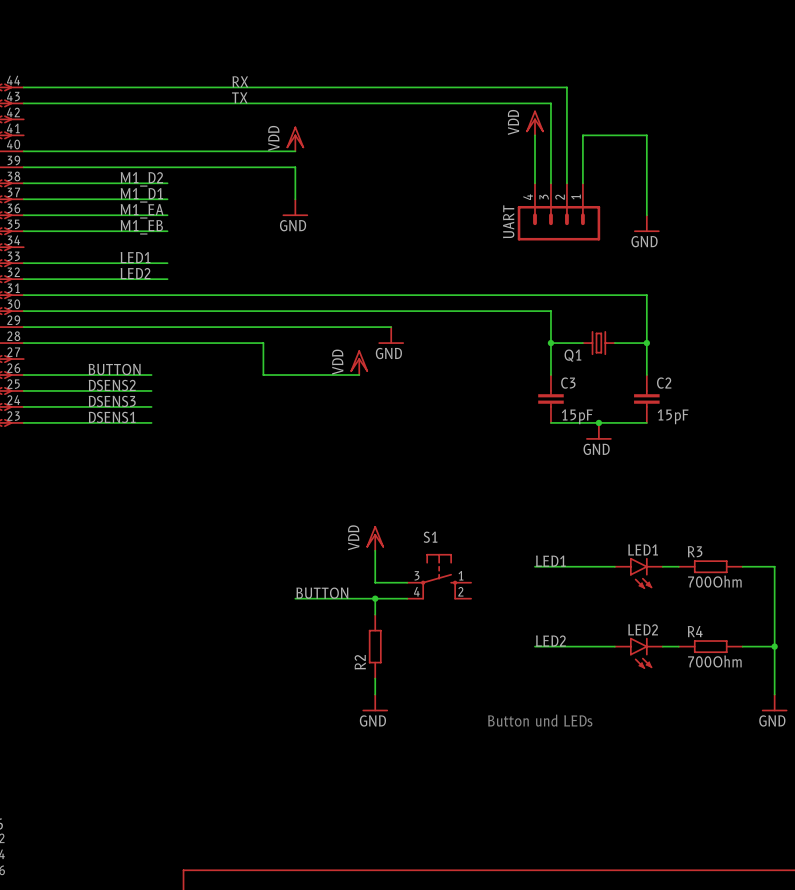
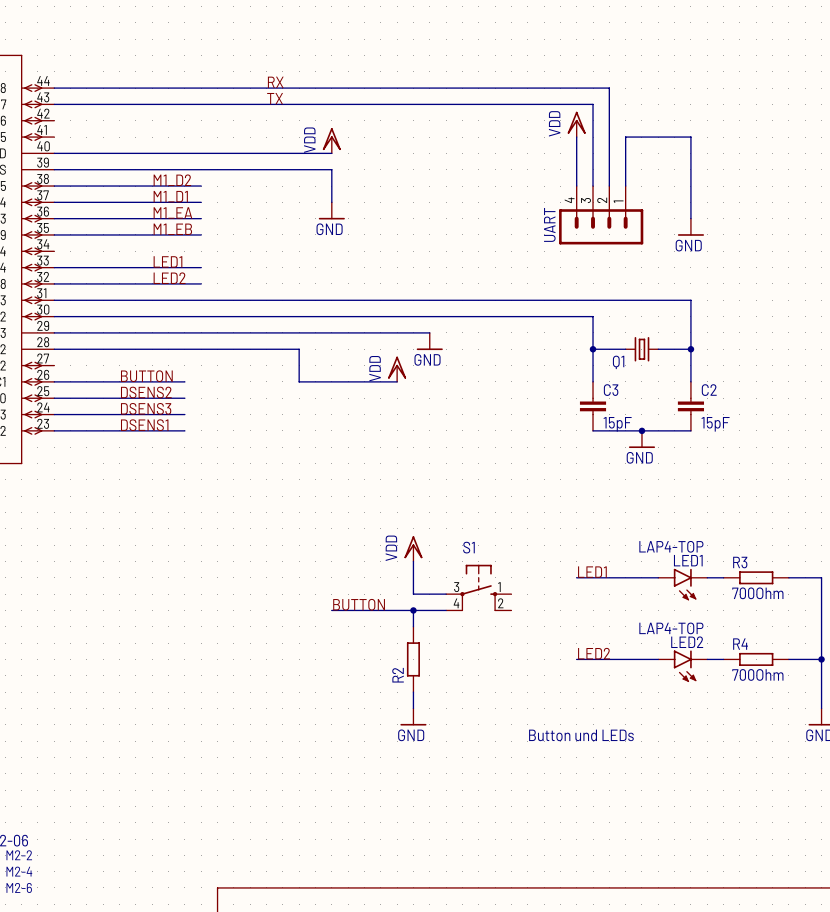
LED1 value: none -> LAP4-TOP (671, 546)
LED2 value: none -> LAP4-TOP (671, 628)

